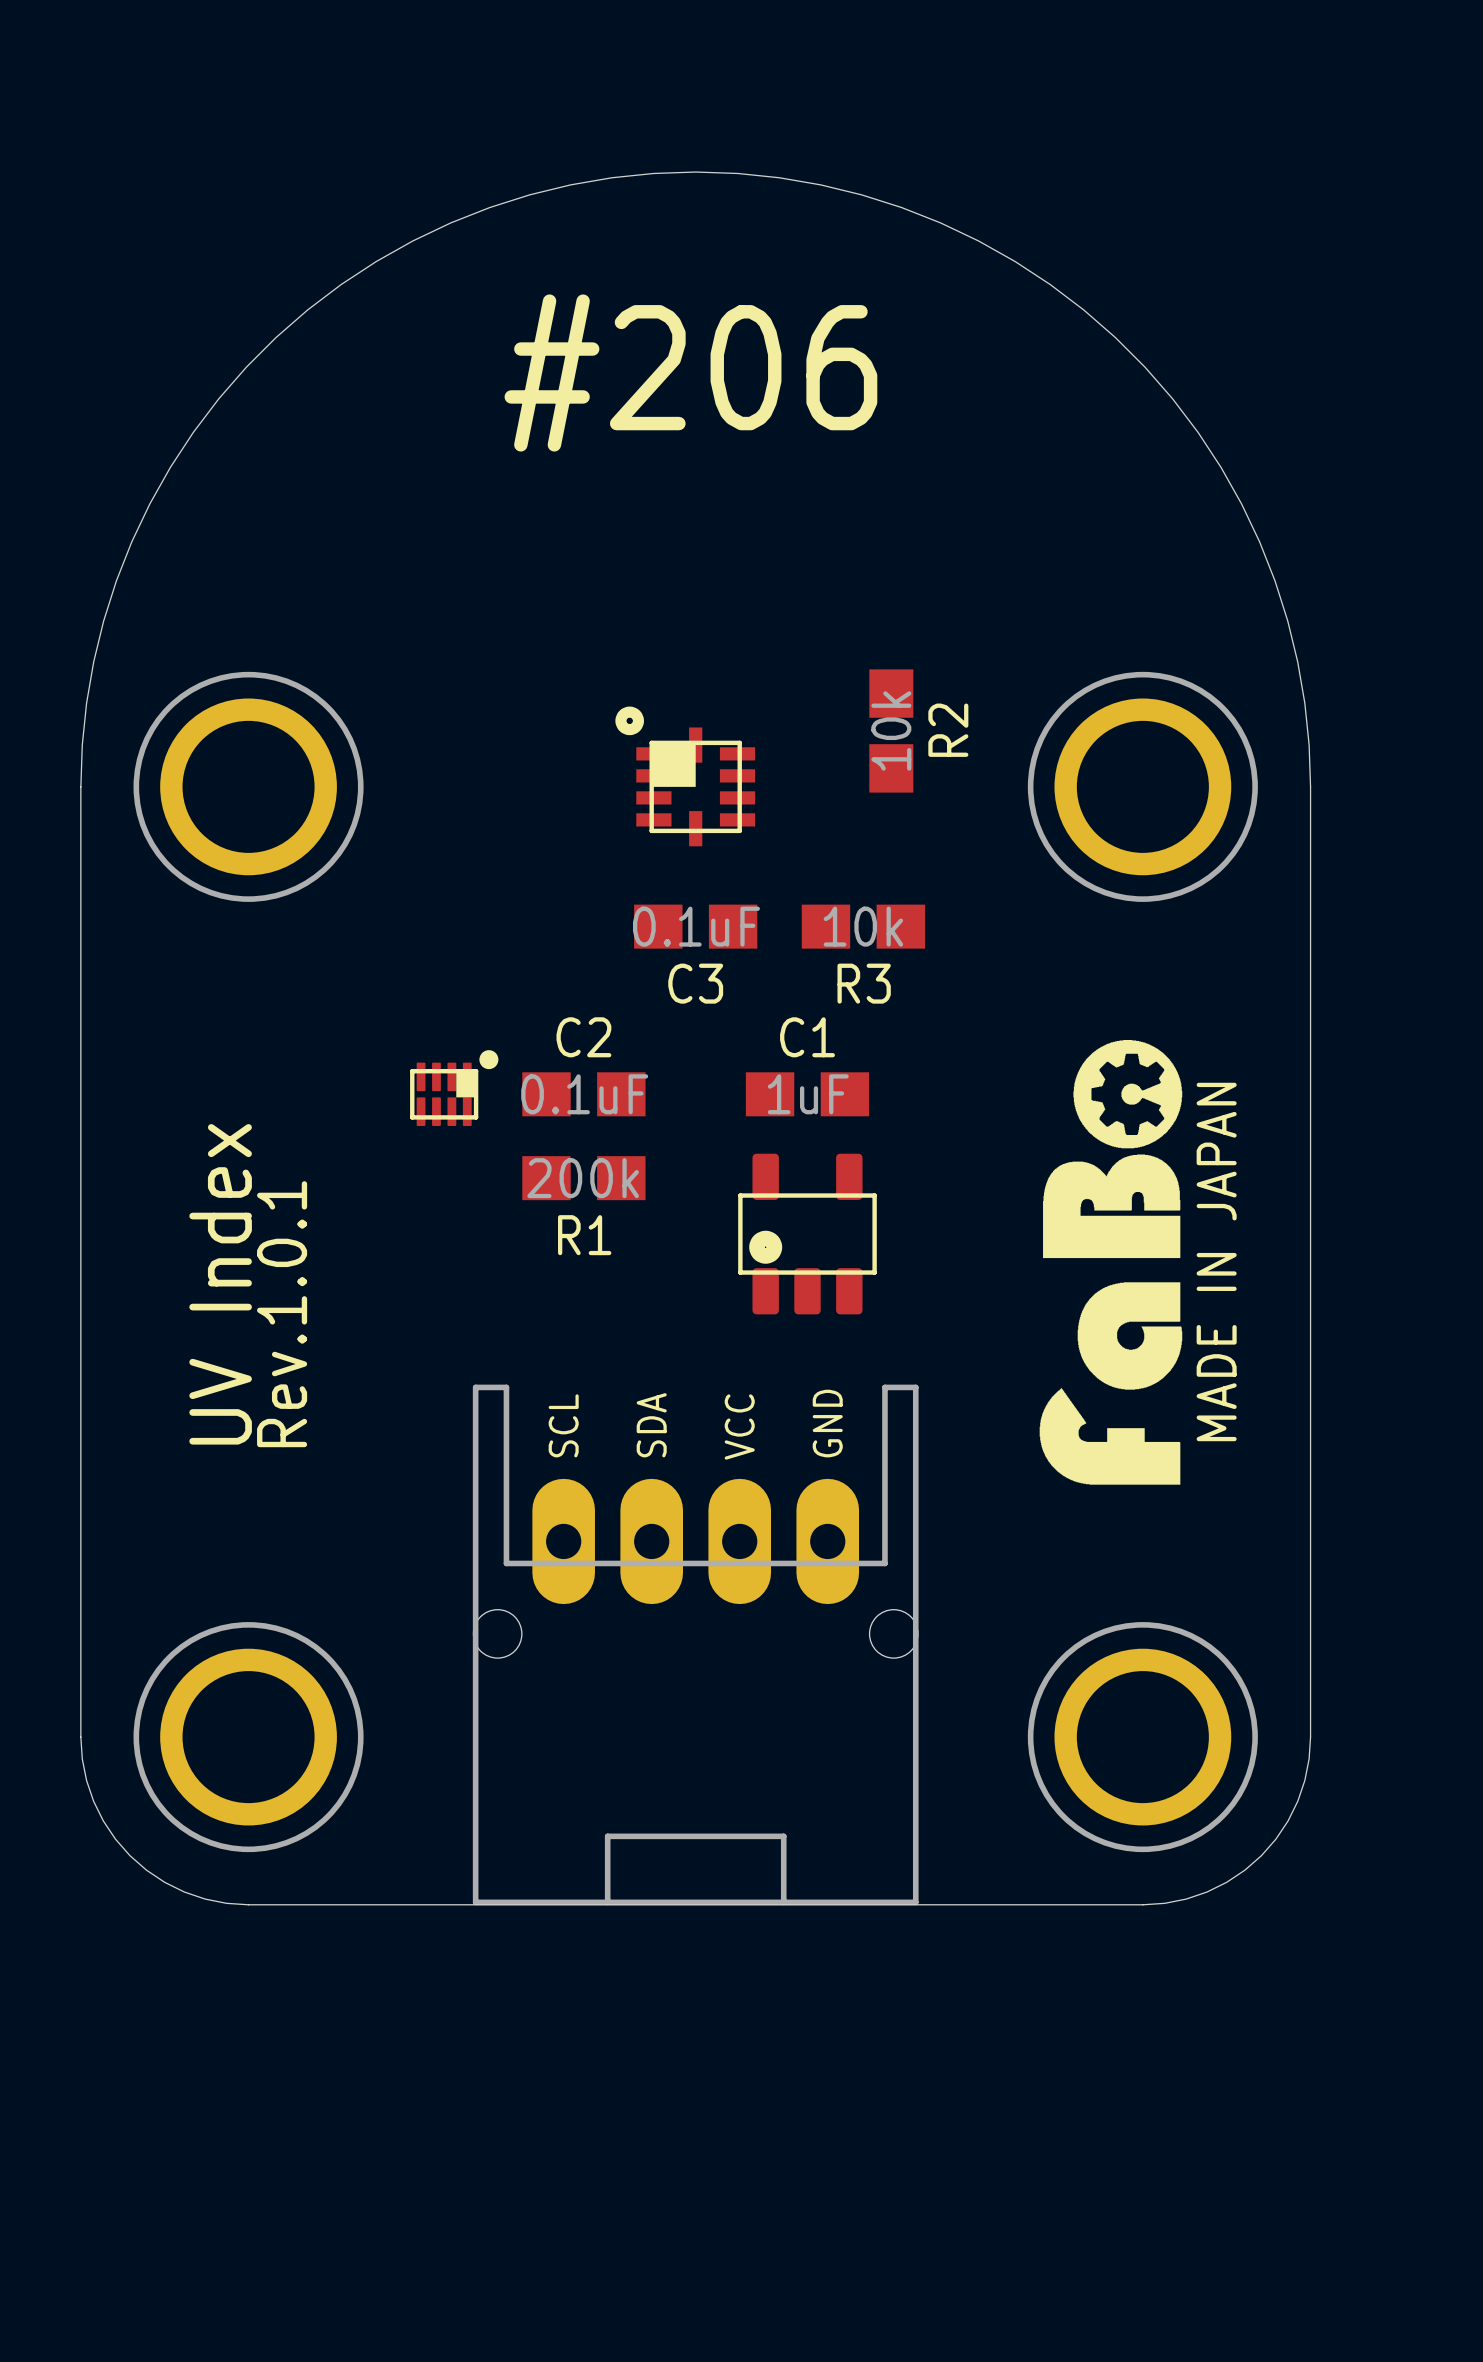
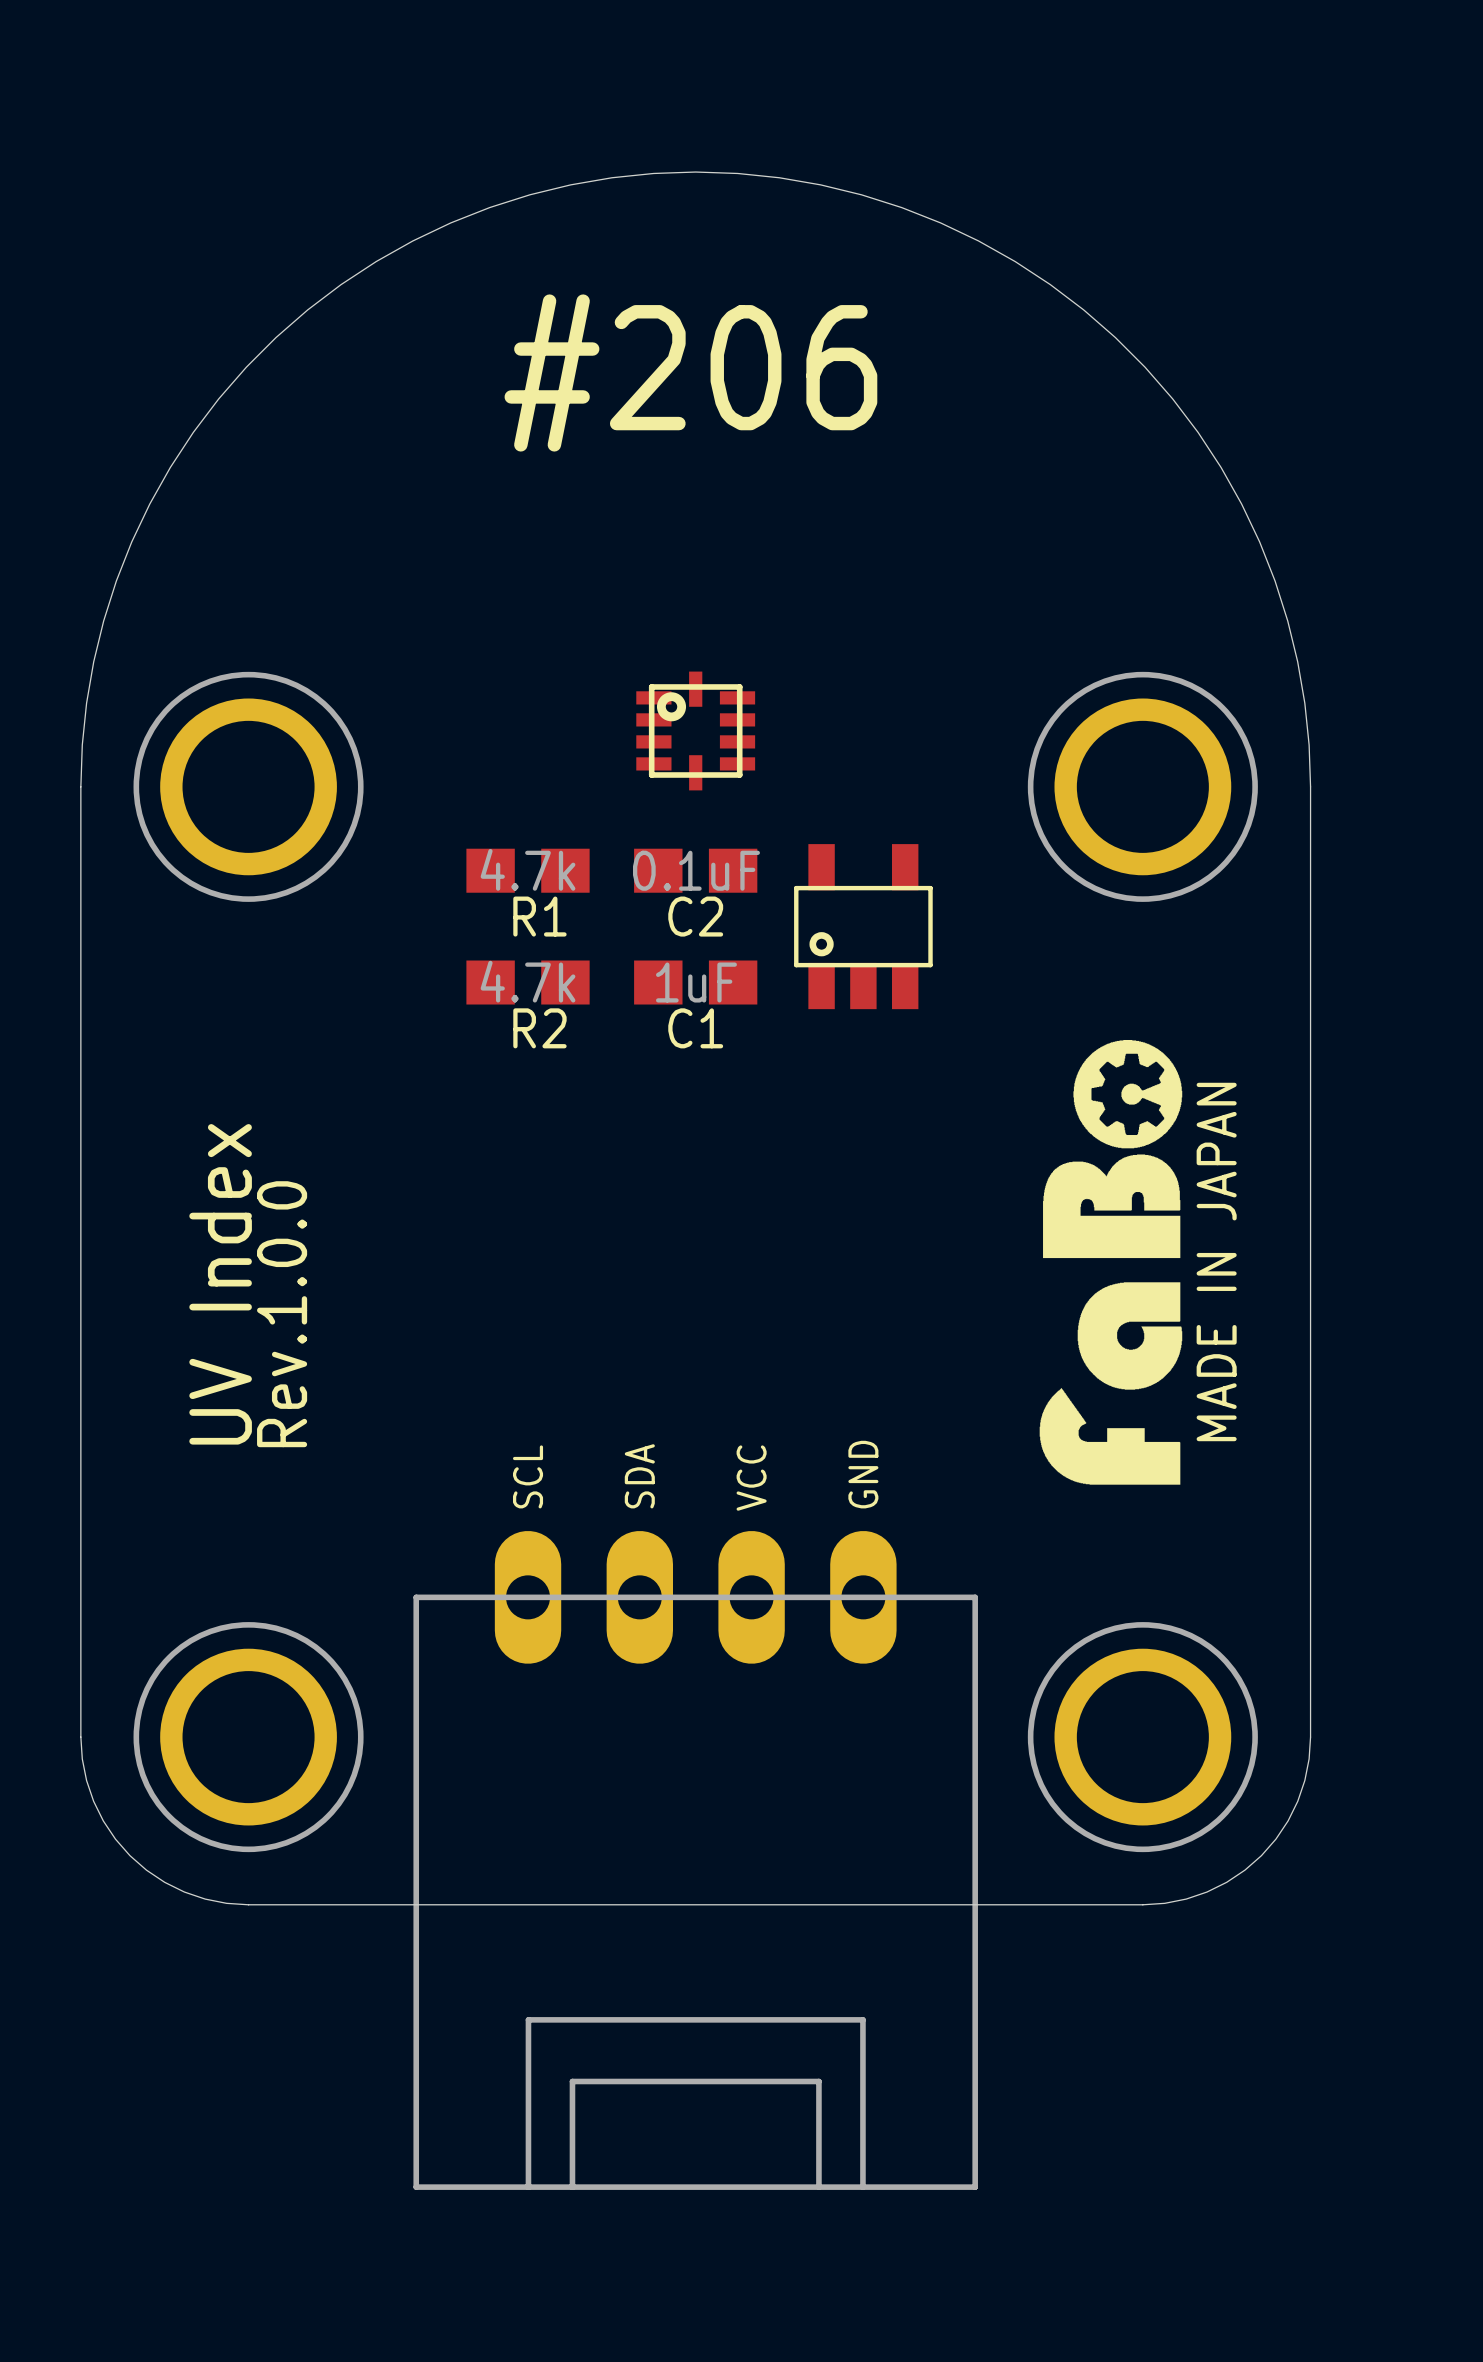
part: none -> (695, 730)
R2 rotation: 0° (891, 730) -> 90° clockwise (528, 982)
R2 position: (891, 730) -> (528, 982)
R2 value: 10k (891, 730) -> 4.7k (528, 981)
part: (685, 776) -> none
C3: 0.1uF (695, 926) -> none
R3: 10k (863, 926) -> none
part: none -> (863, 926)
C2 name position: C2 (583, 1037) -> C2 (695, 916)
C1 name position: C1 (807, 1037) -> C1 (695, 1028)
part: (695, 1038) -> none
part: (454, 1088) -> none
C2 position: (583, 1094) -> (695, 870)
C1 position: (807, 1094) -> (695, 982)
R1 position: (583, 1178) -> (528, 870)
R1 value: 200k (583, 1178) -> 4.7k (528, 869)
part: none -> (695, 1180)
part: (807, 1234) -> none
R1 name position: R1 (584, 1235) -> R1 (539, 916)
text: Rev.1.0.1 (282, 1314) -> Rev.1.0.0 (282, 1314)

